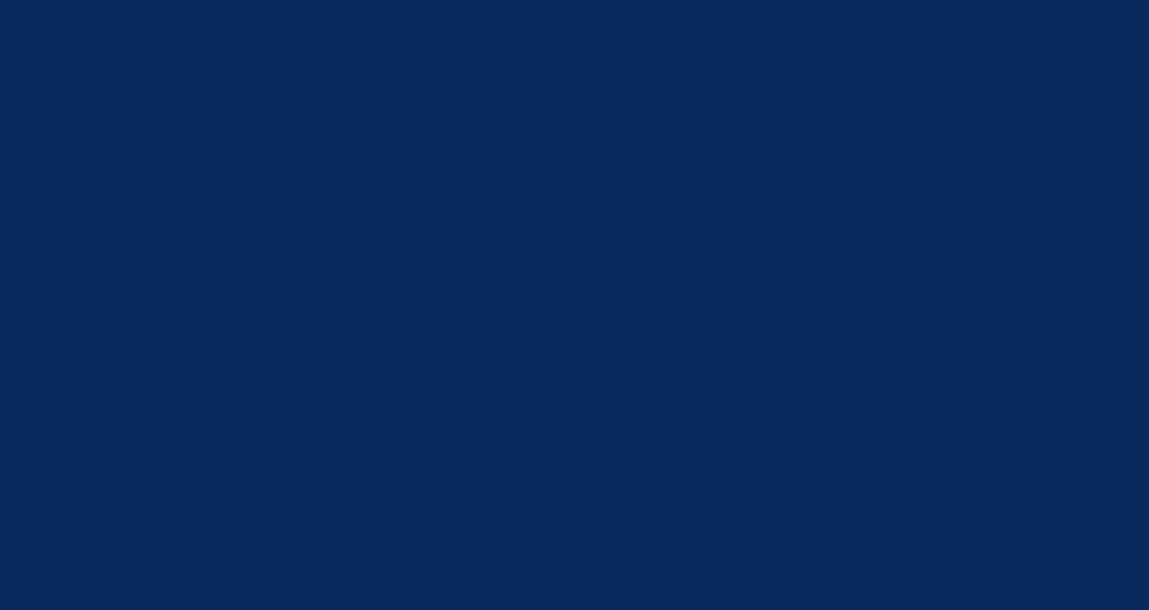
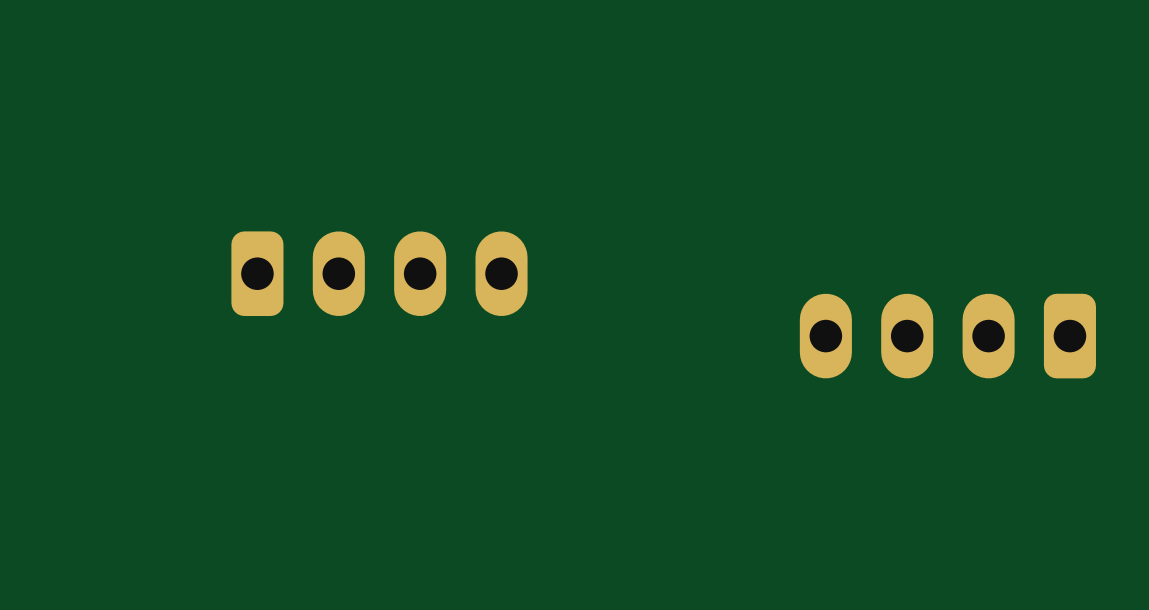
part: none -> (379, 273)
part: none -> (947, 336)

